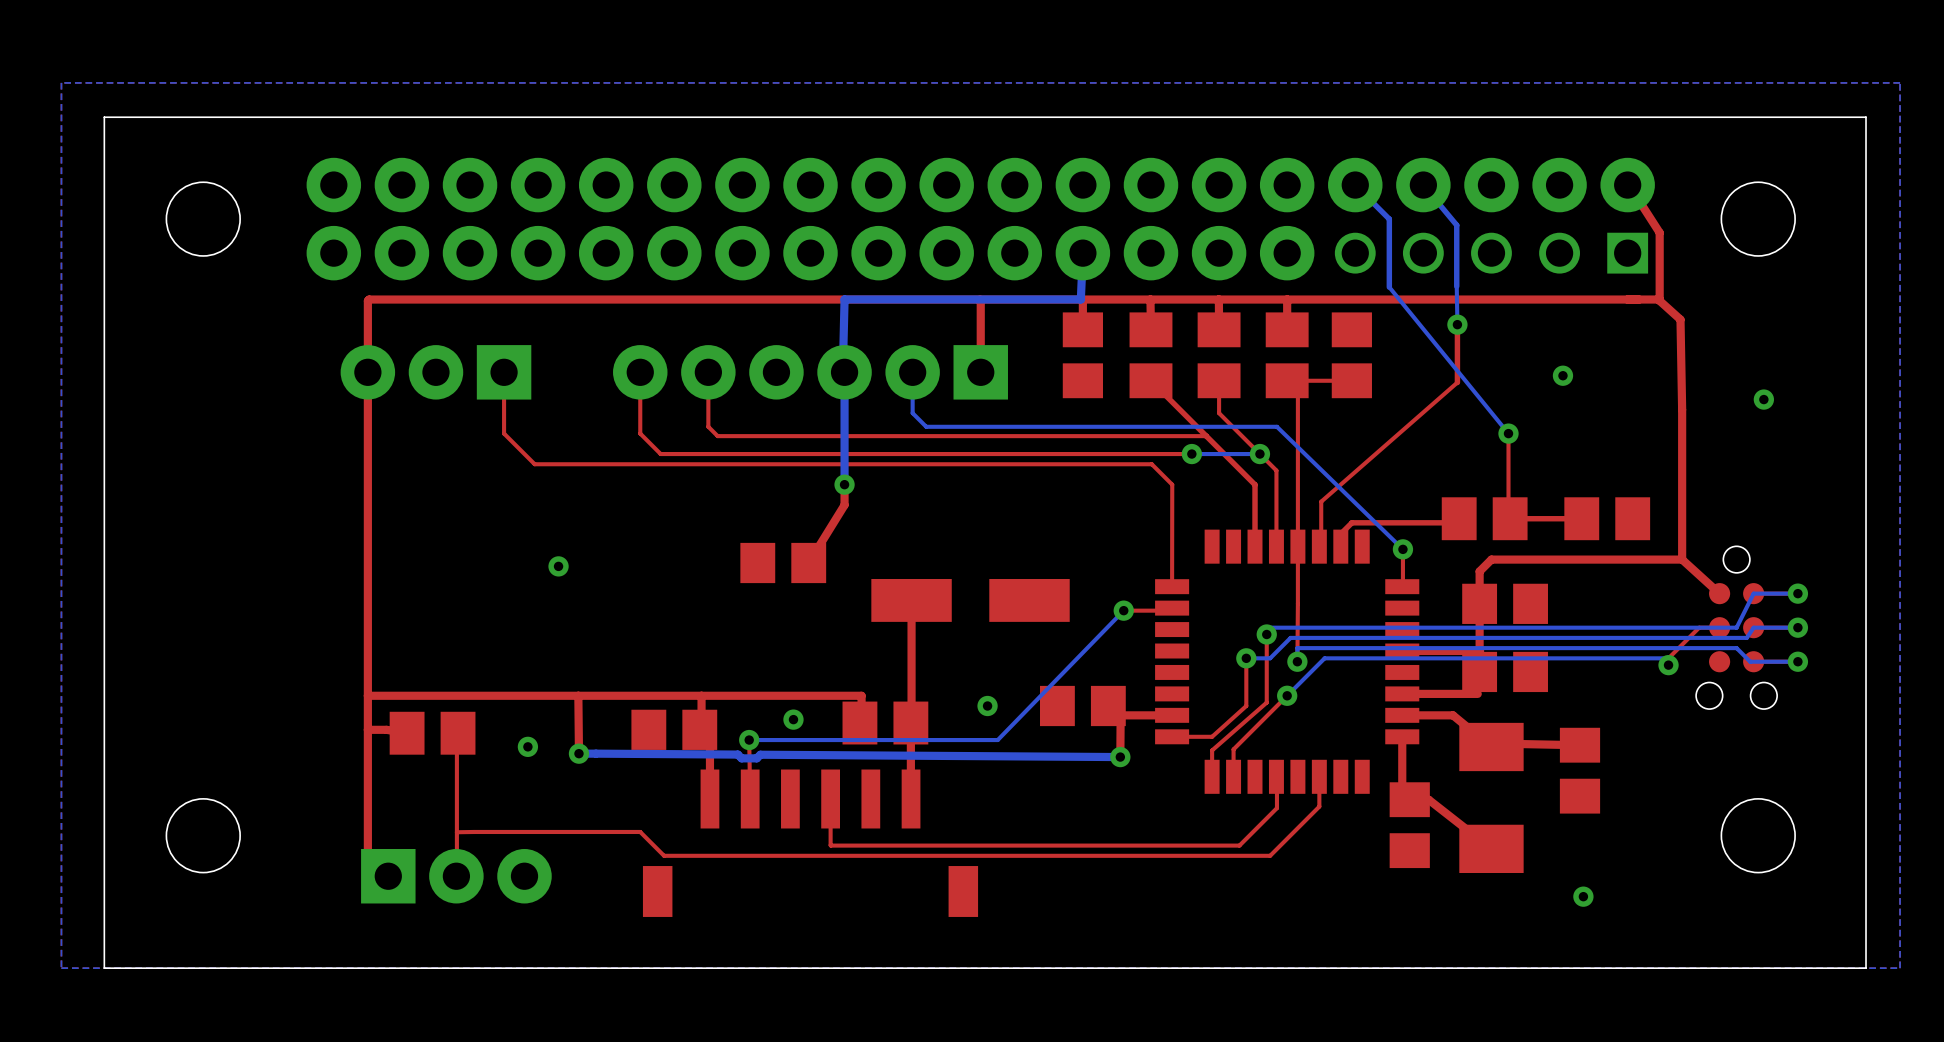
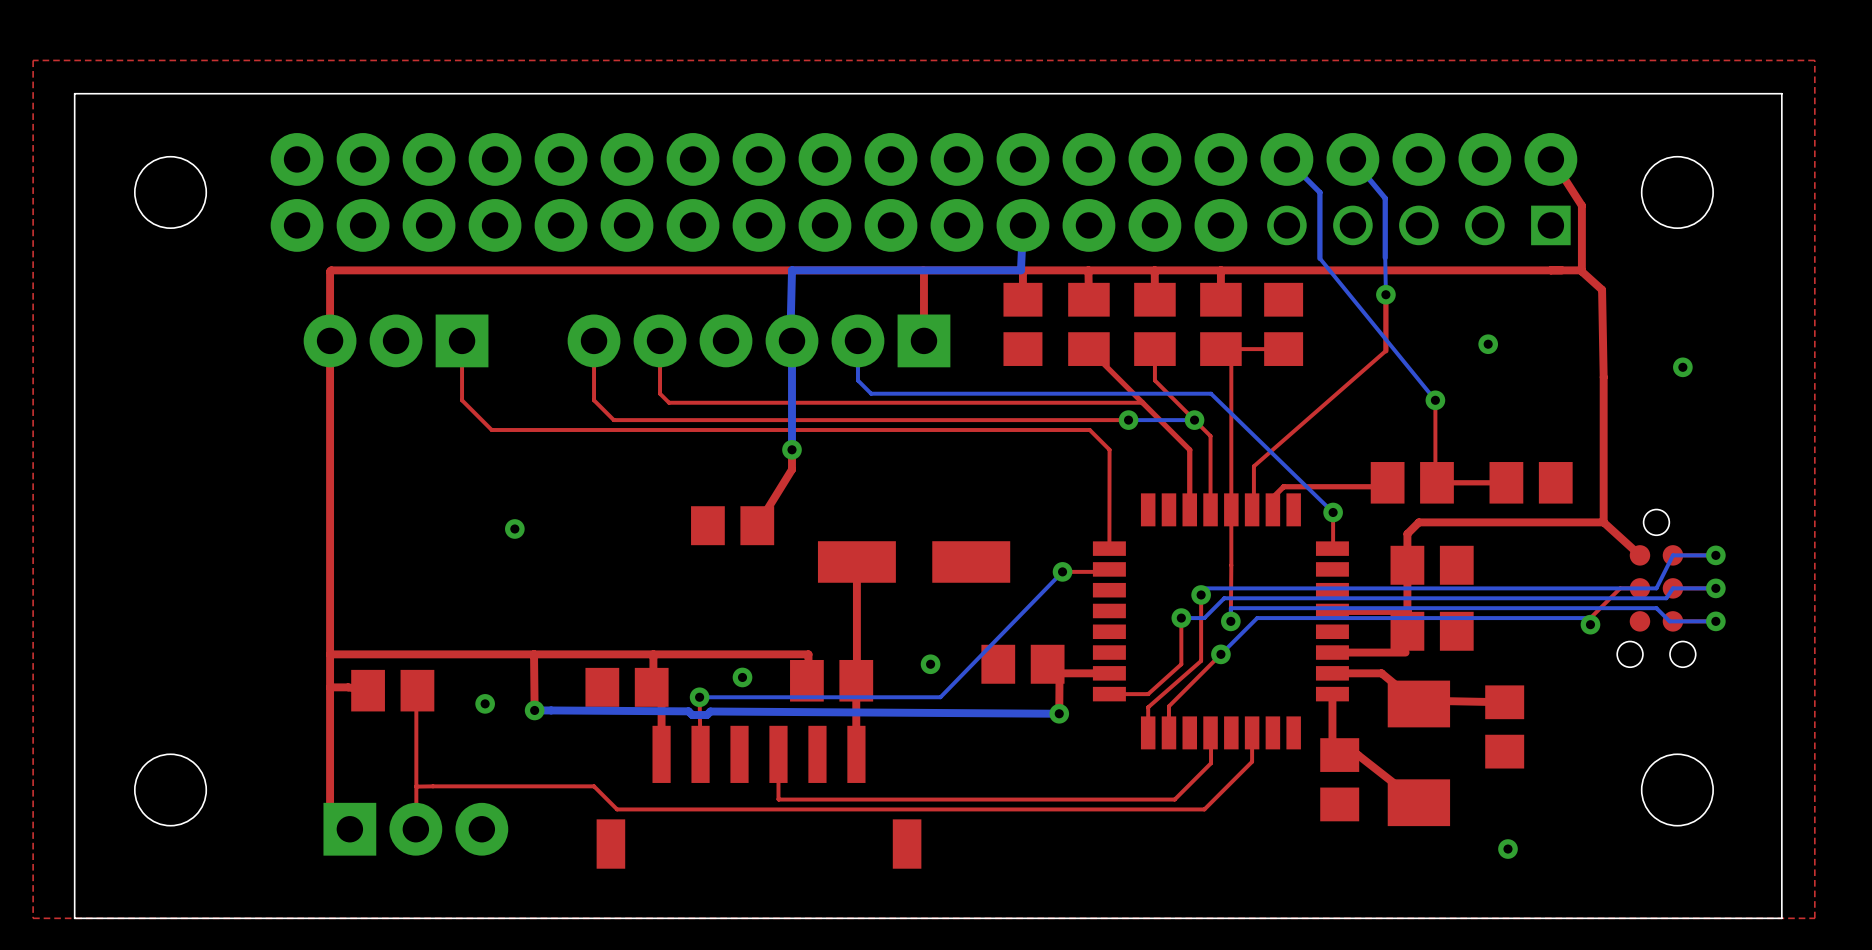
bottom zone outline: (1900, 82) (61, 82) (61, 968) (1900, 968) (1900, 82) -> none

